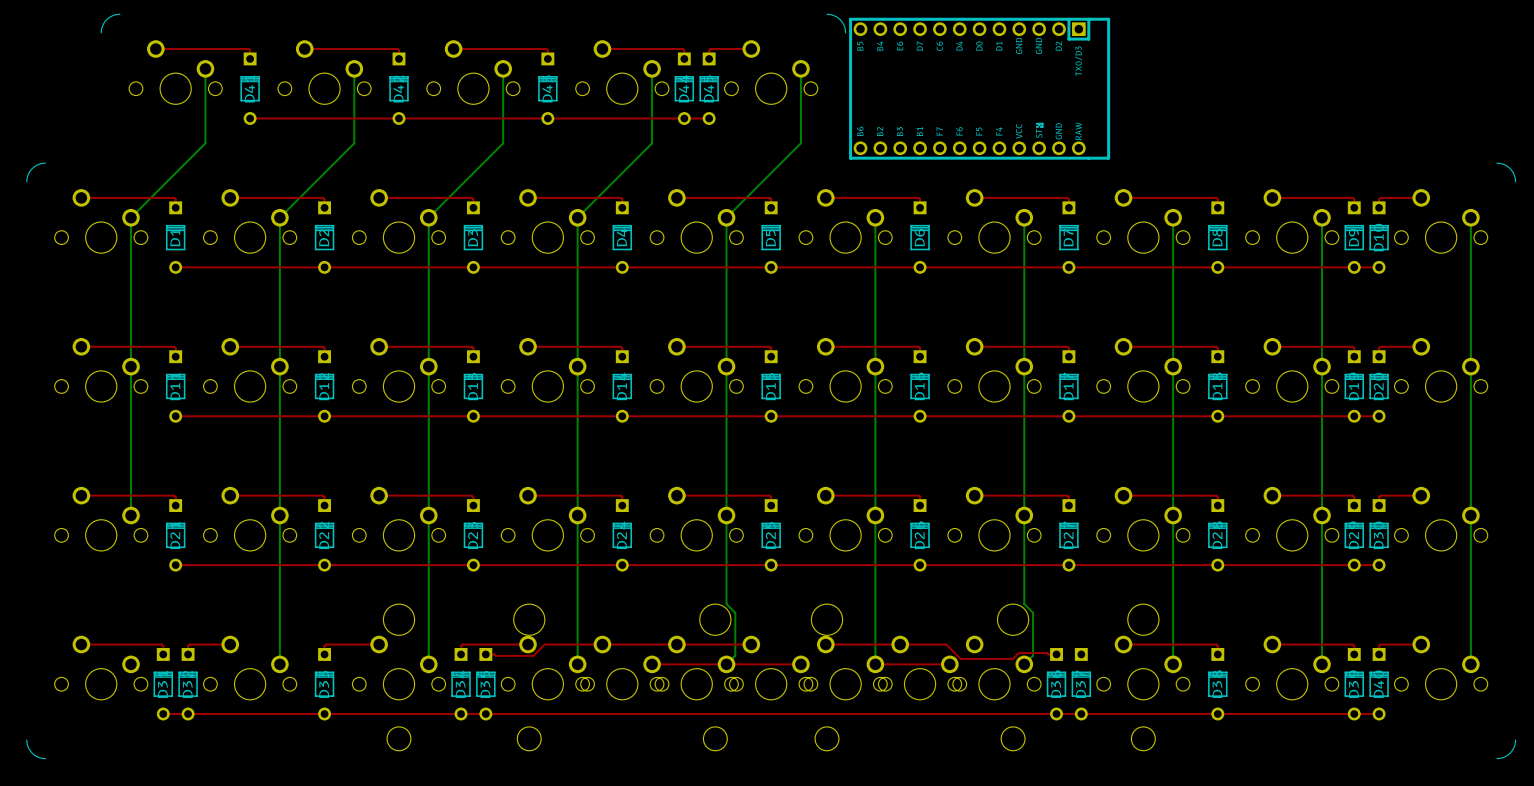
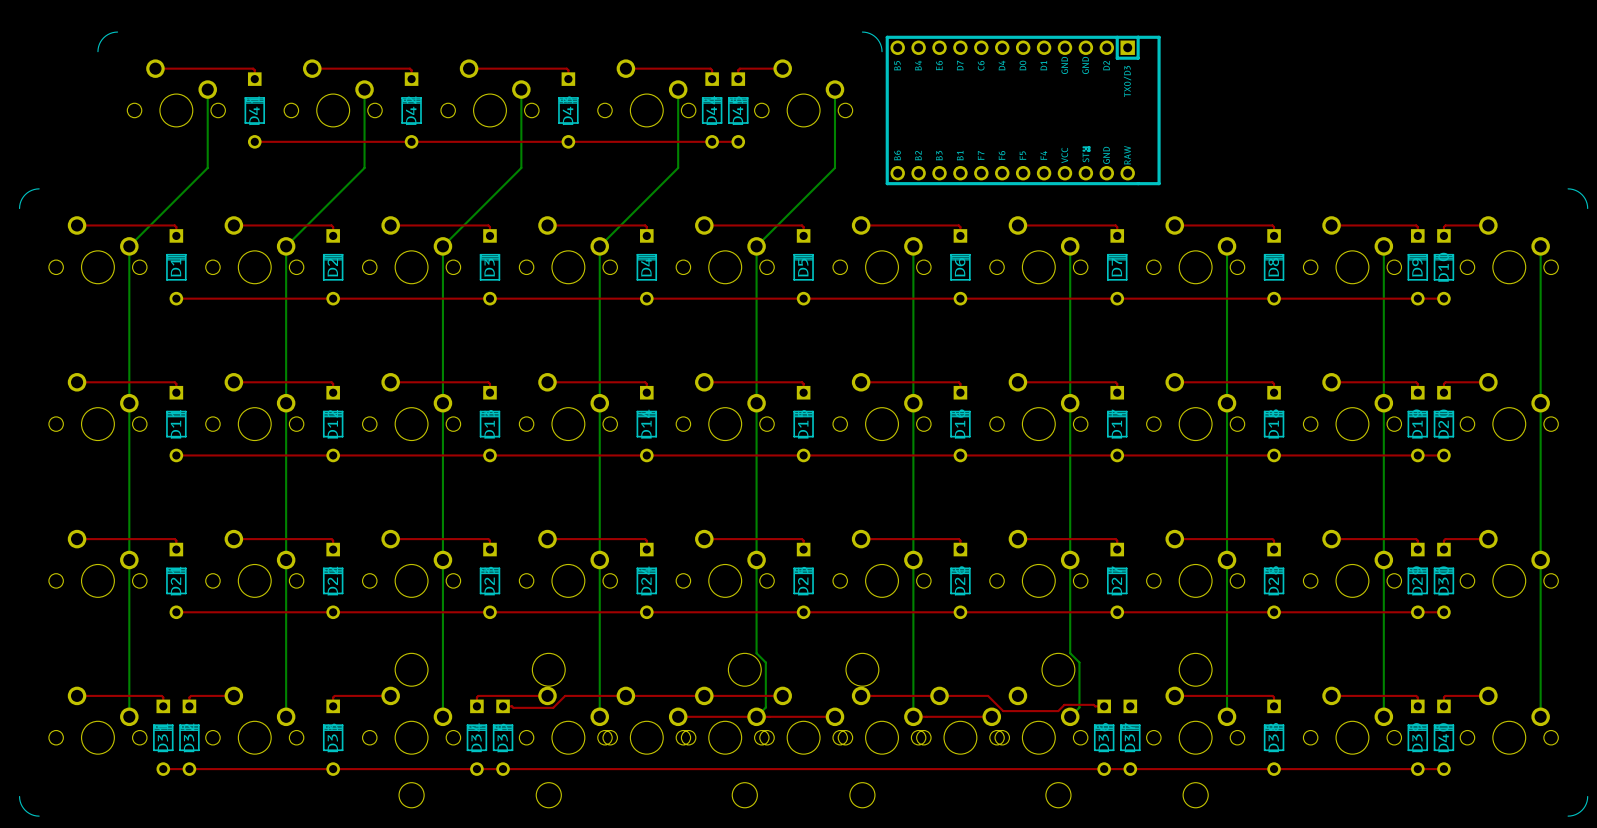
bottom track: none -> (129, 560) (129, 716)

